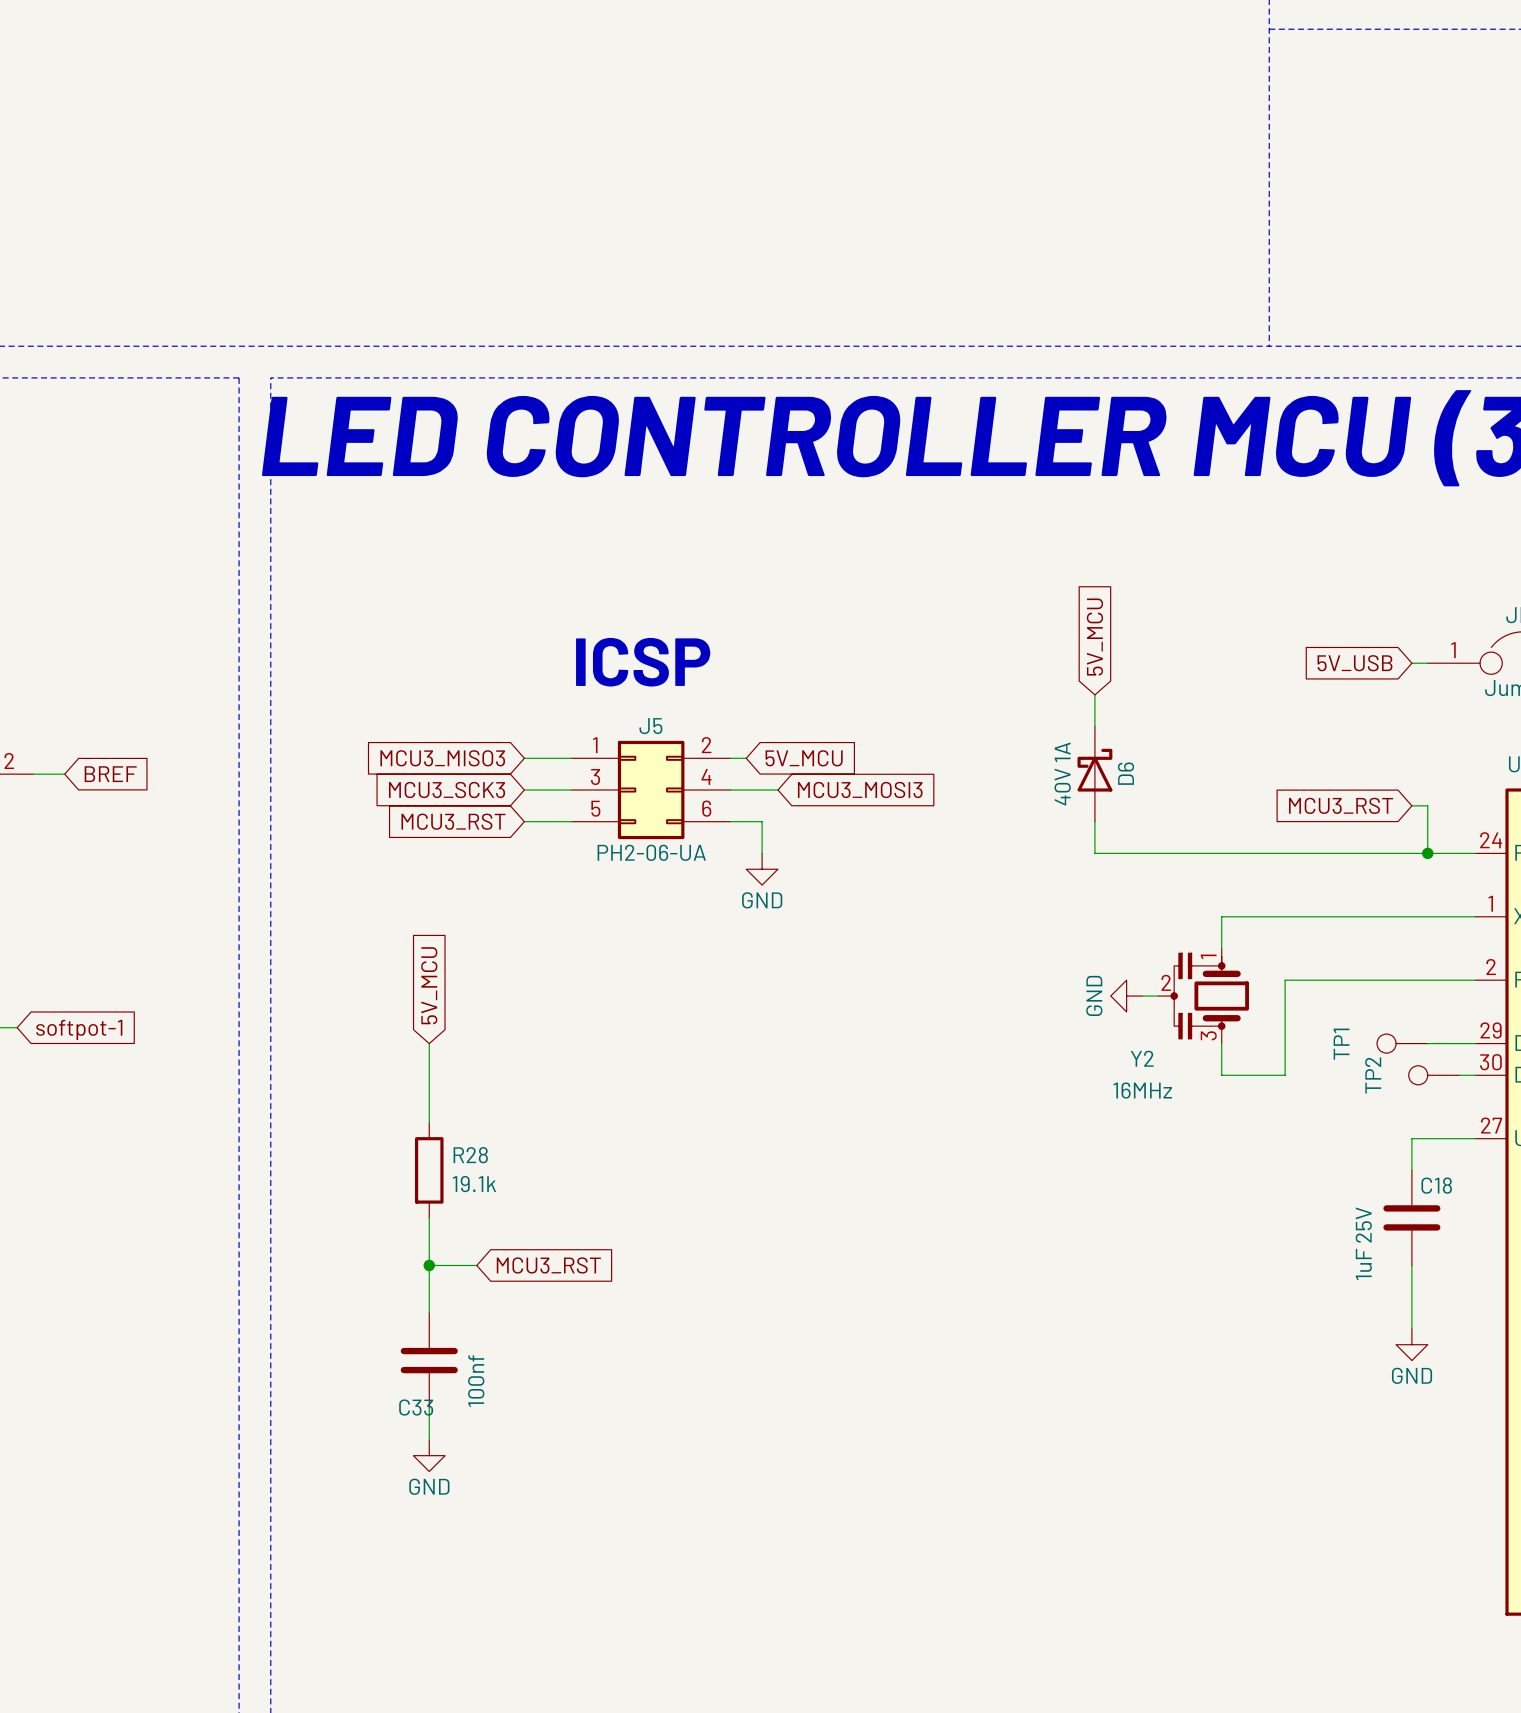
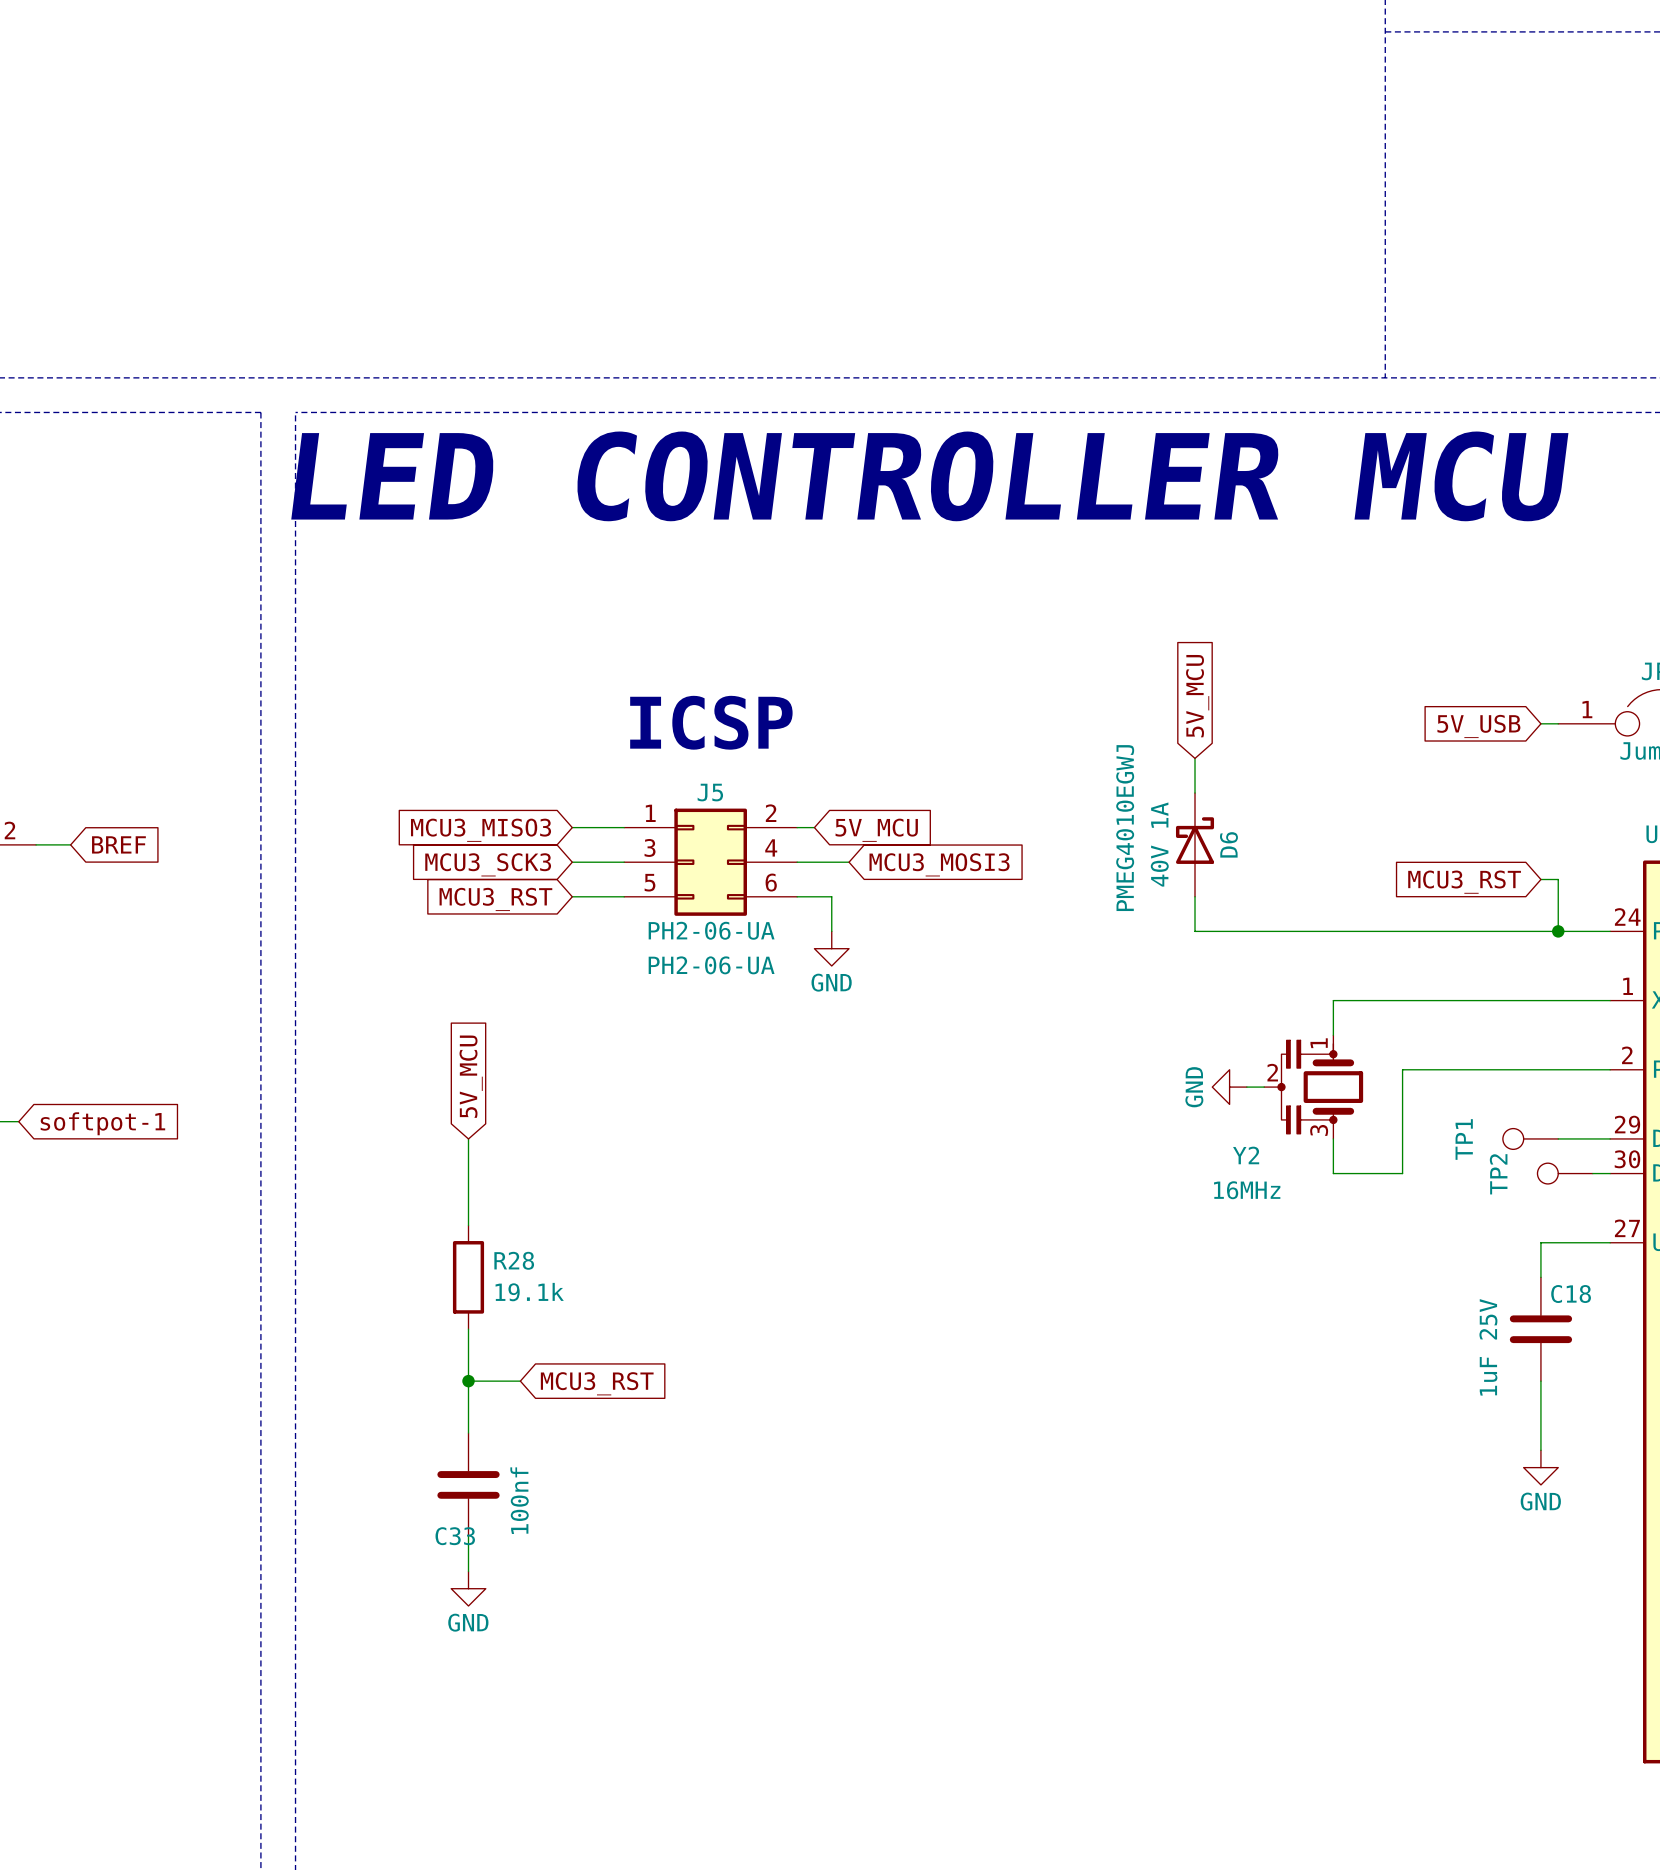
D6 text: none -> PMEG4010EGWJ (1125, 828)
J5 text: none -> PH2-06-UA (711, 965)

